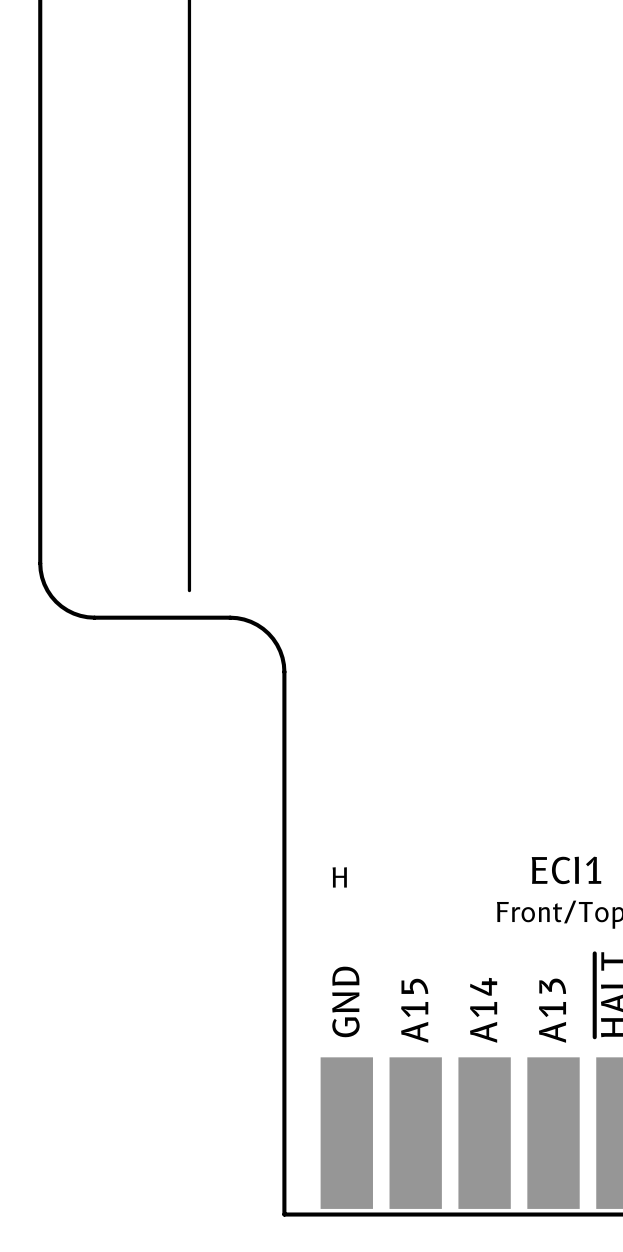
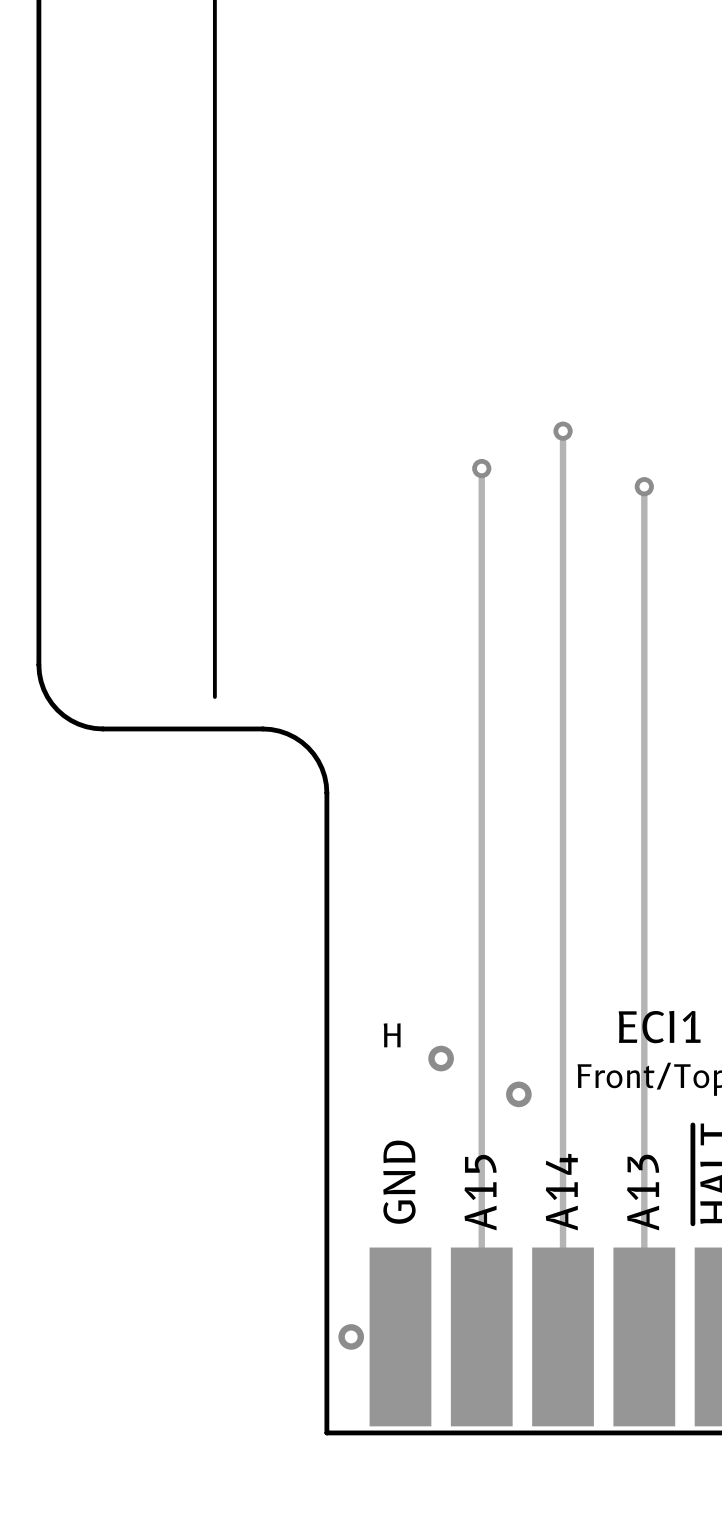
track: none -> (563, 431) (563, 1336)
via: none -> (563, 431)
track: none -> (481, 468) (481, 1336)
via: none -> (481, 468)
track: none -> (644, 486) (644, 1336)
via: none -> (644, 486)
via: none -> (441, 1058)
via: none -> (518, 1094)
via: none -> (351, 1336)

